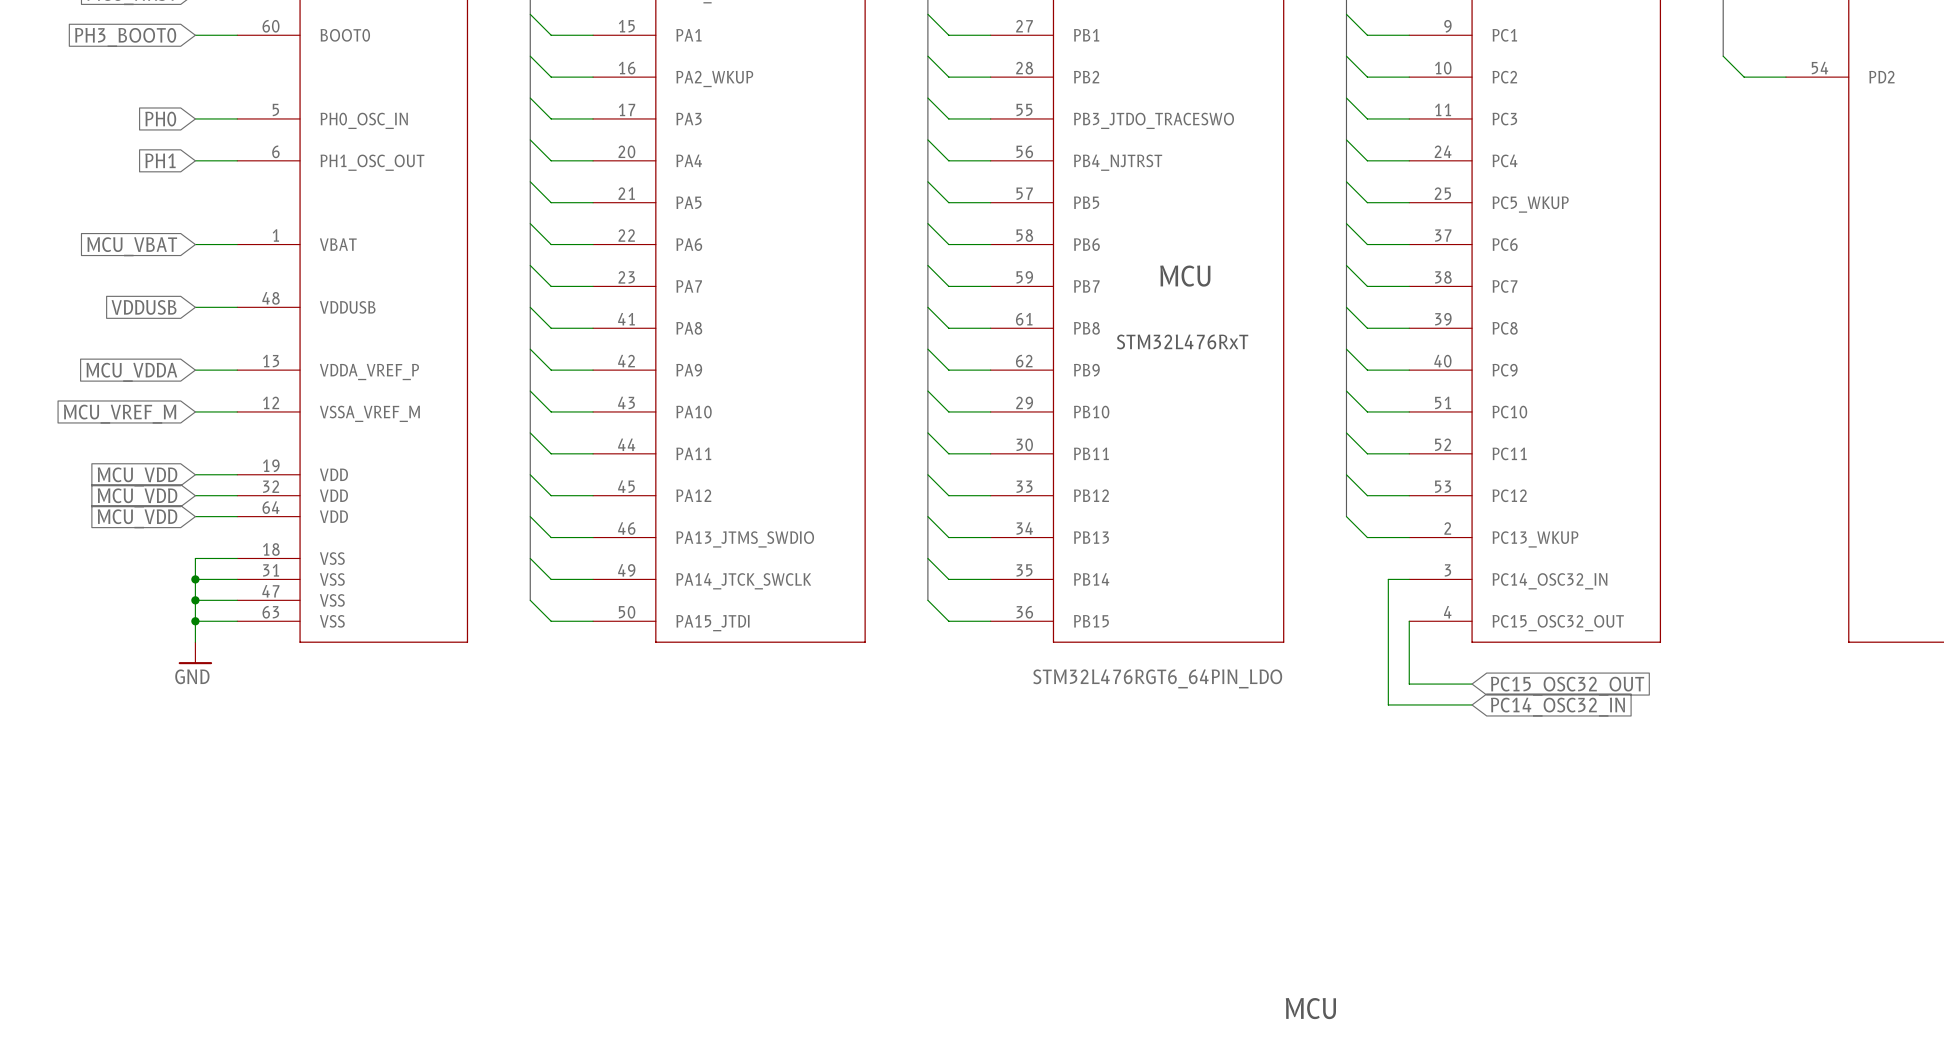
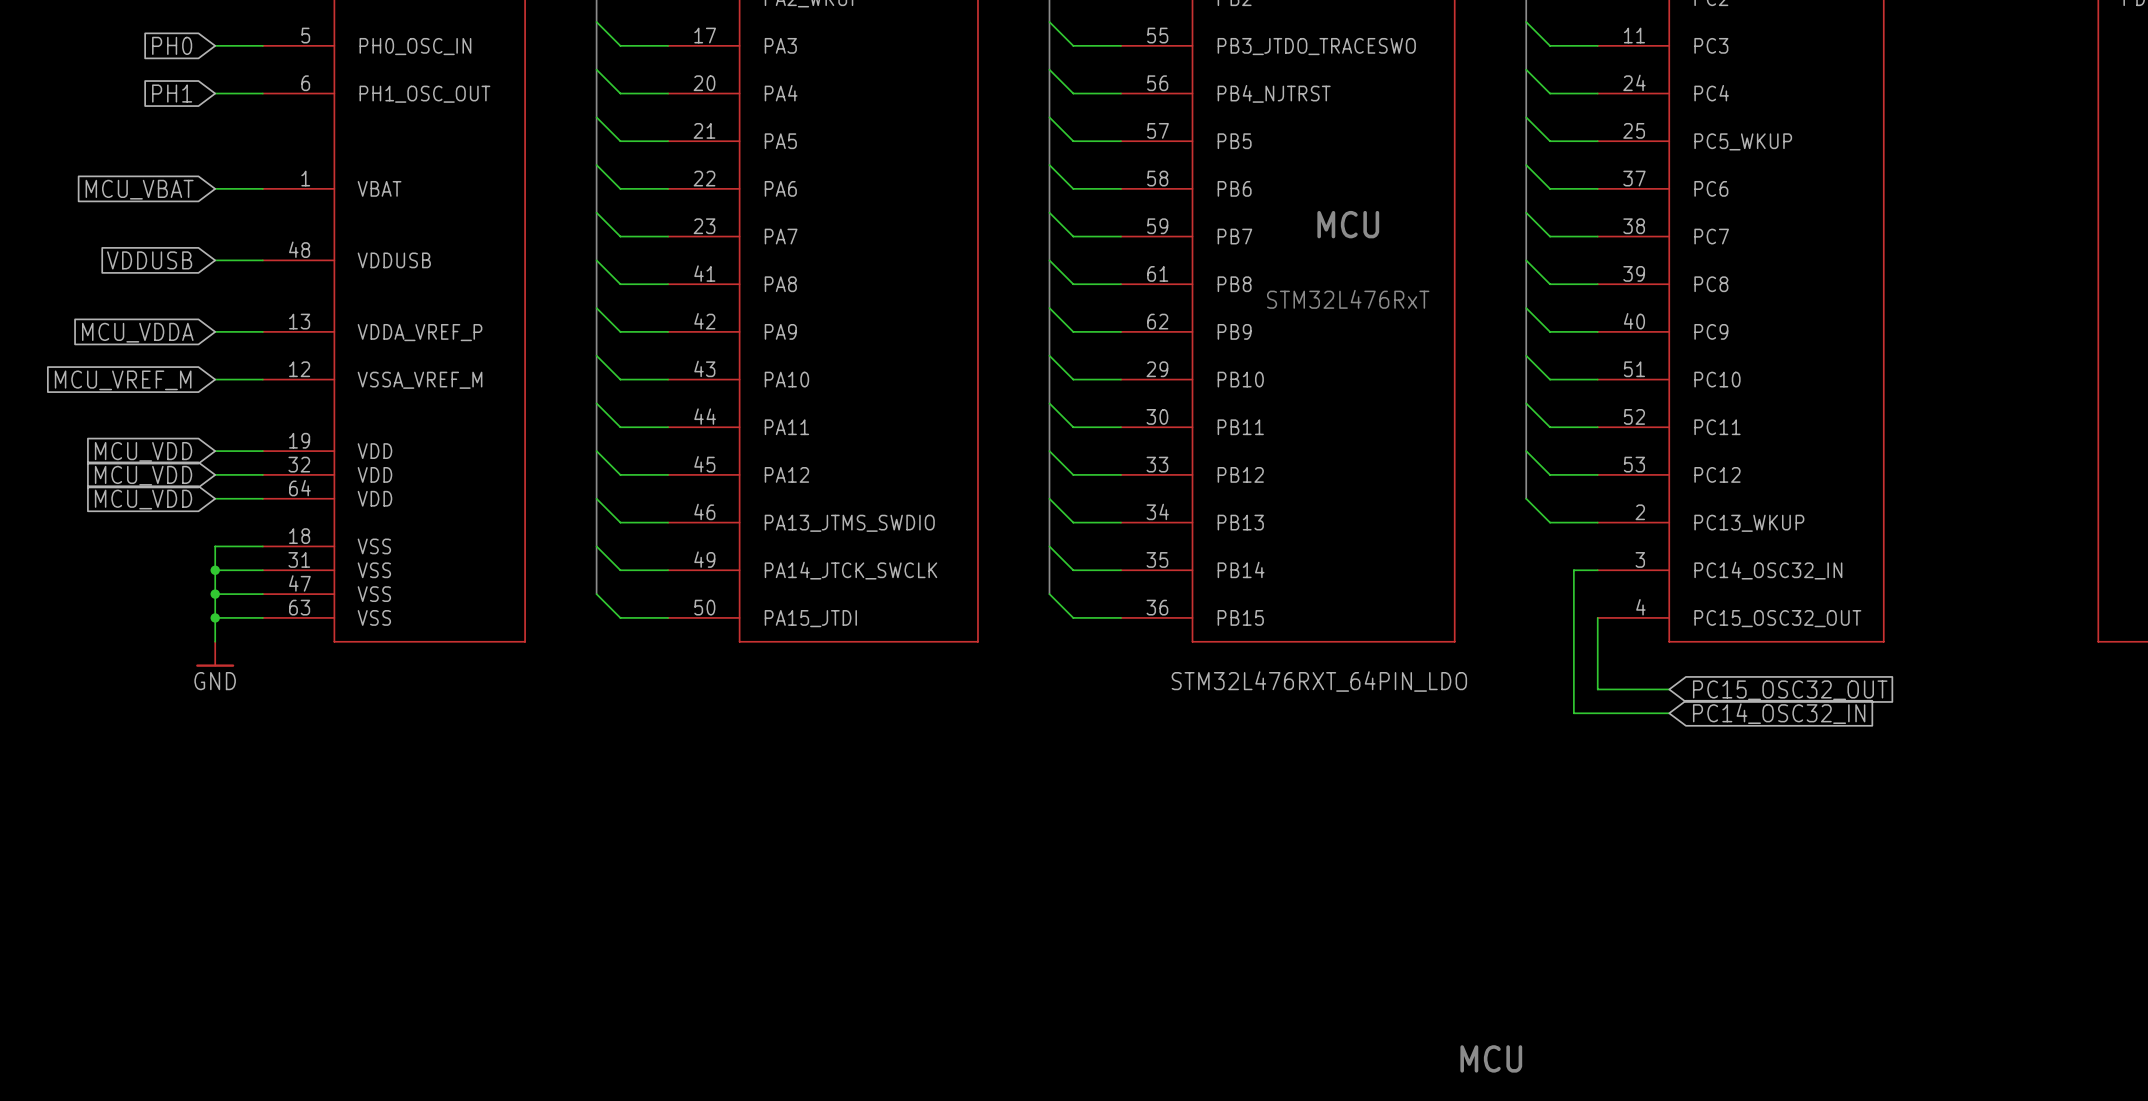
part value: STM32L476RGT6_64PIN_LDO (1157, 678) -> STM32L476RXT_64PIN_LDO (1319, 681)

